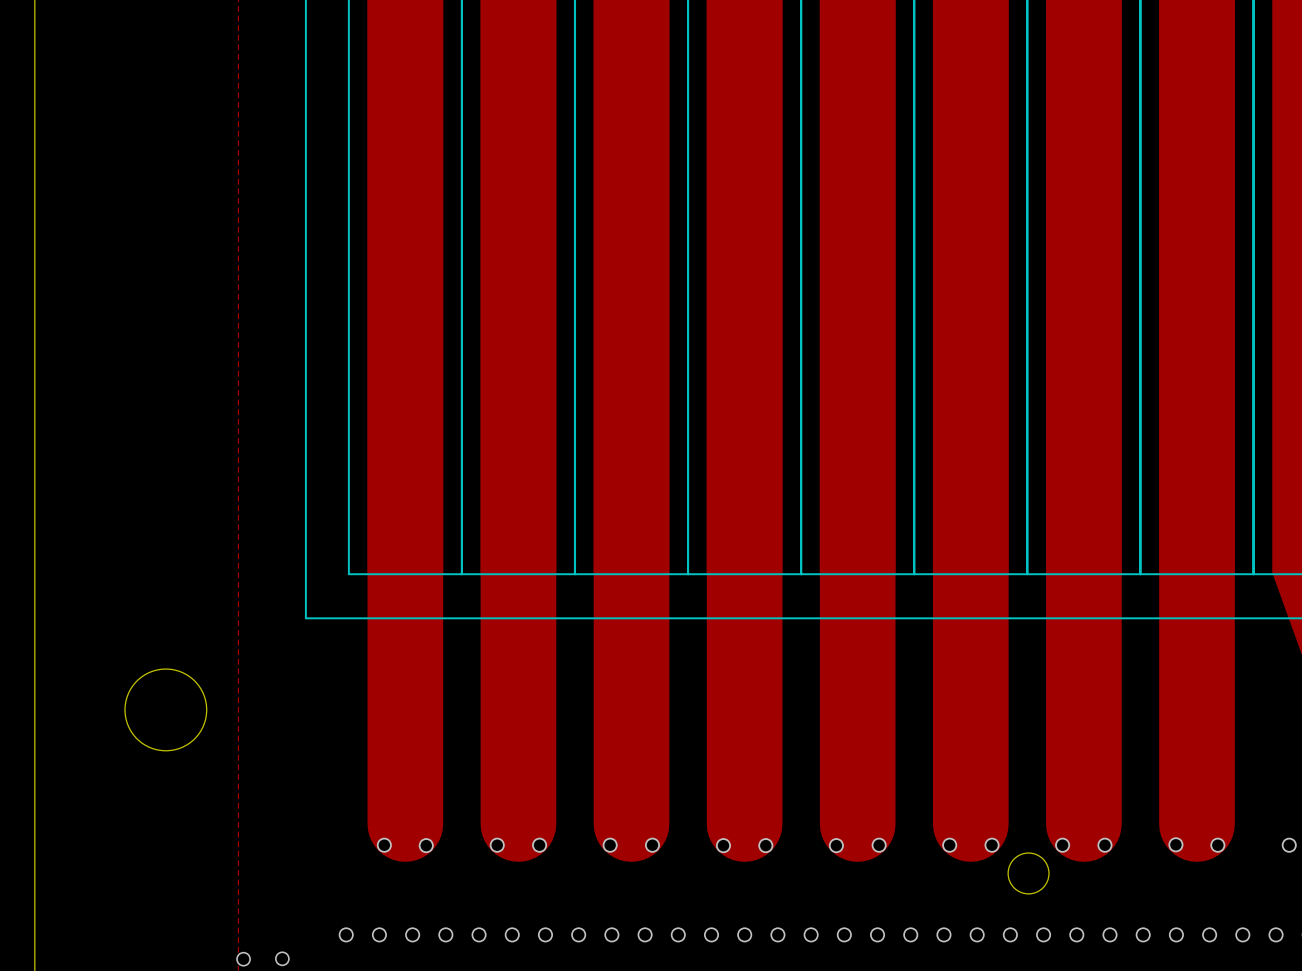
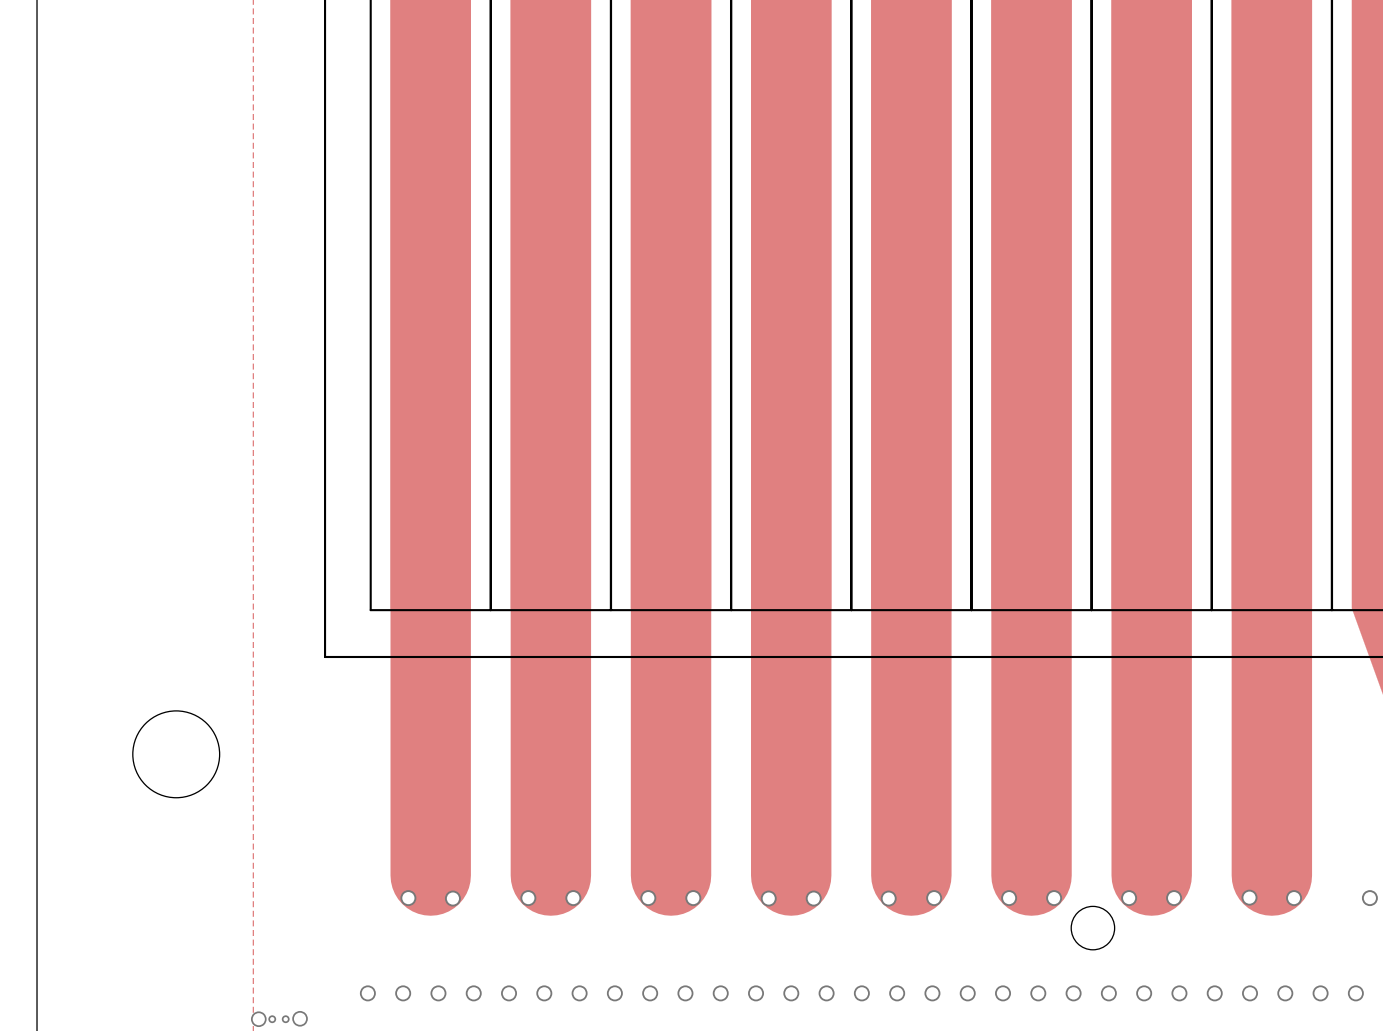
via: none -> (272, 1019)
via: none -> (285, 1019)

